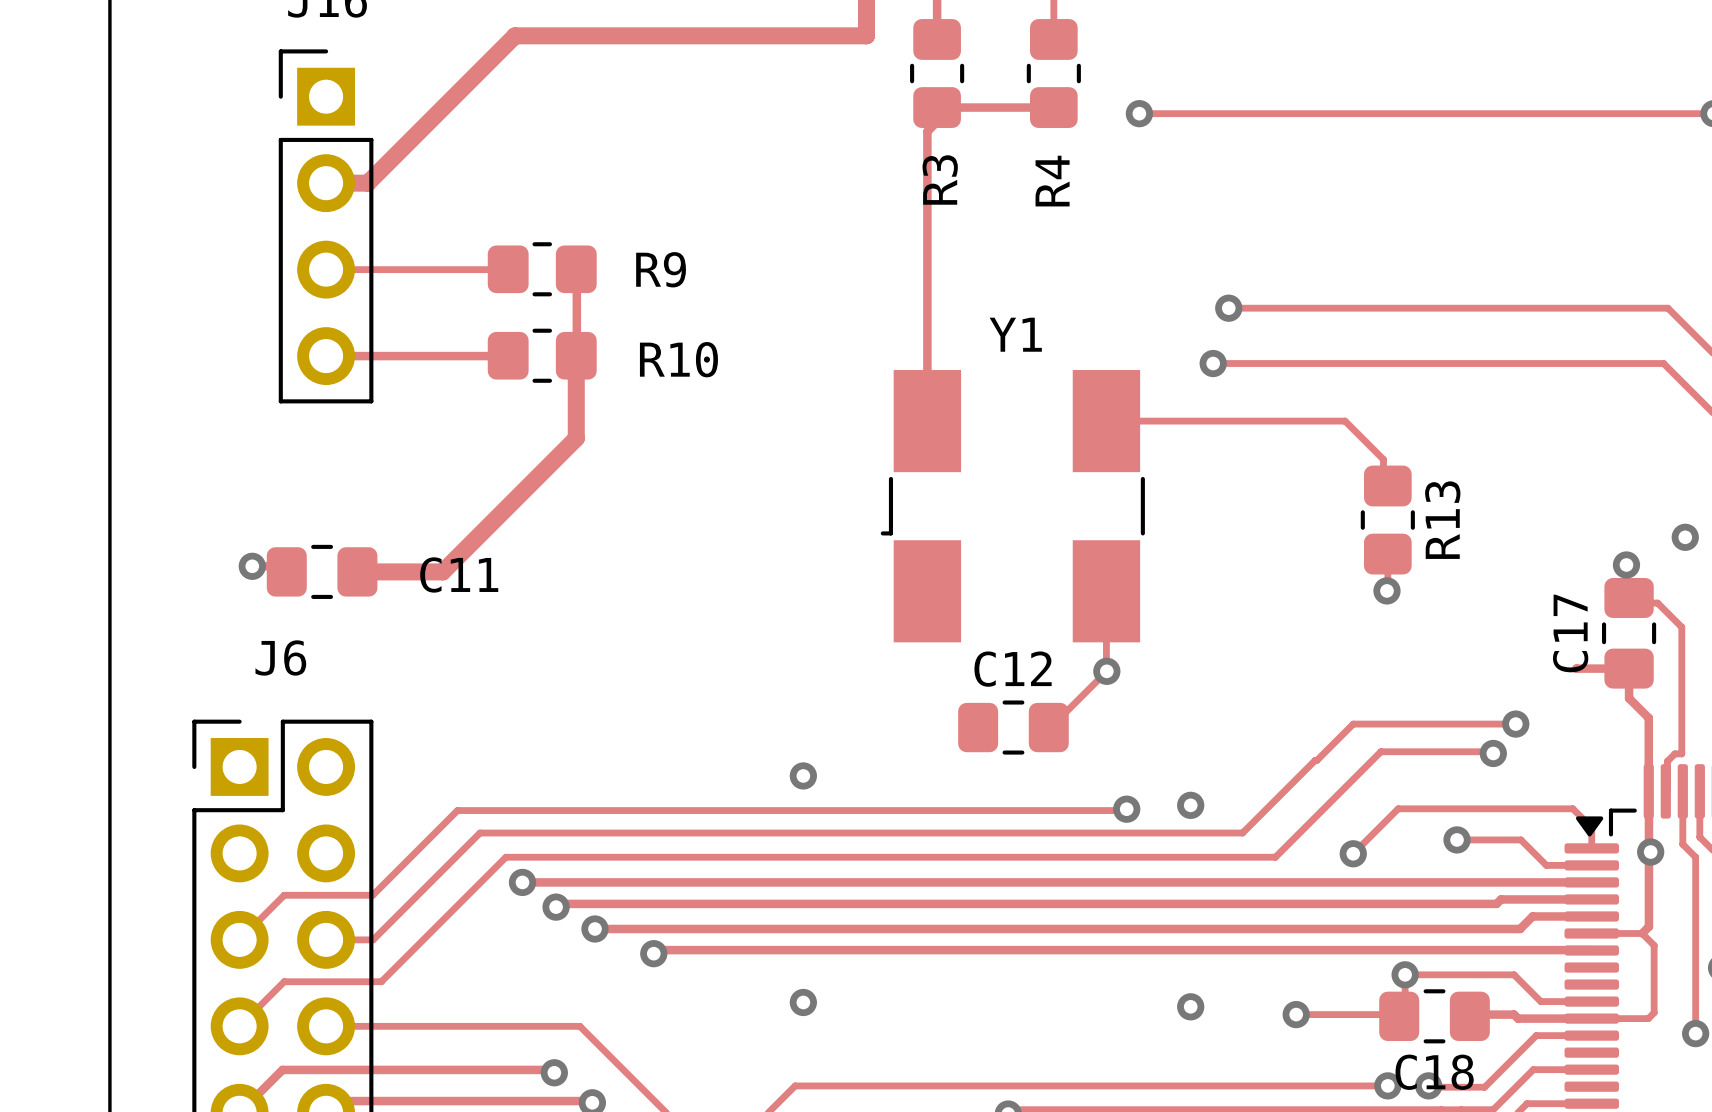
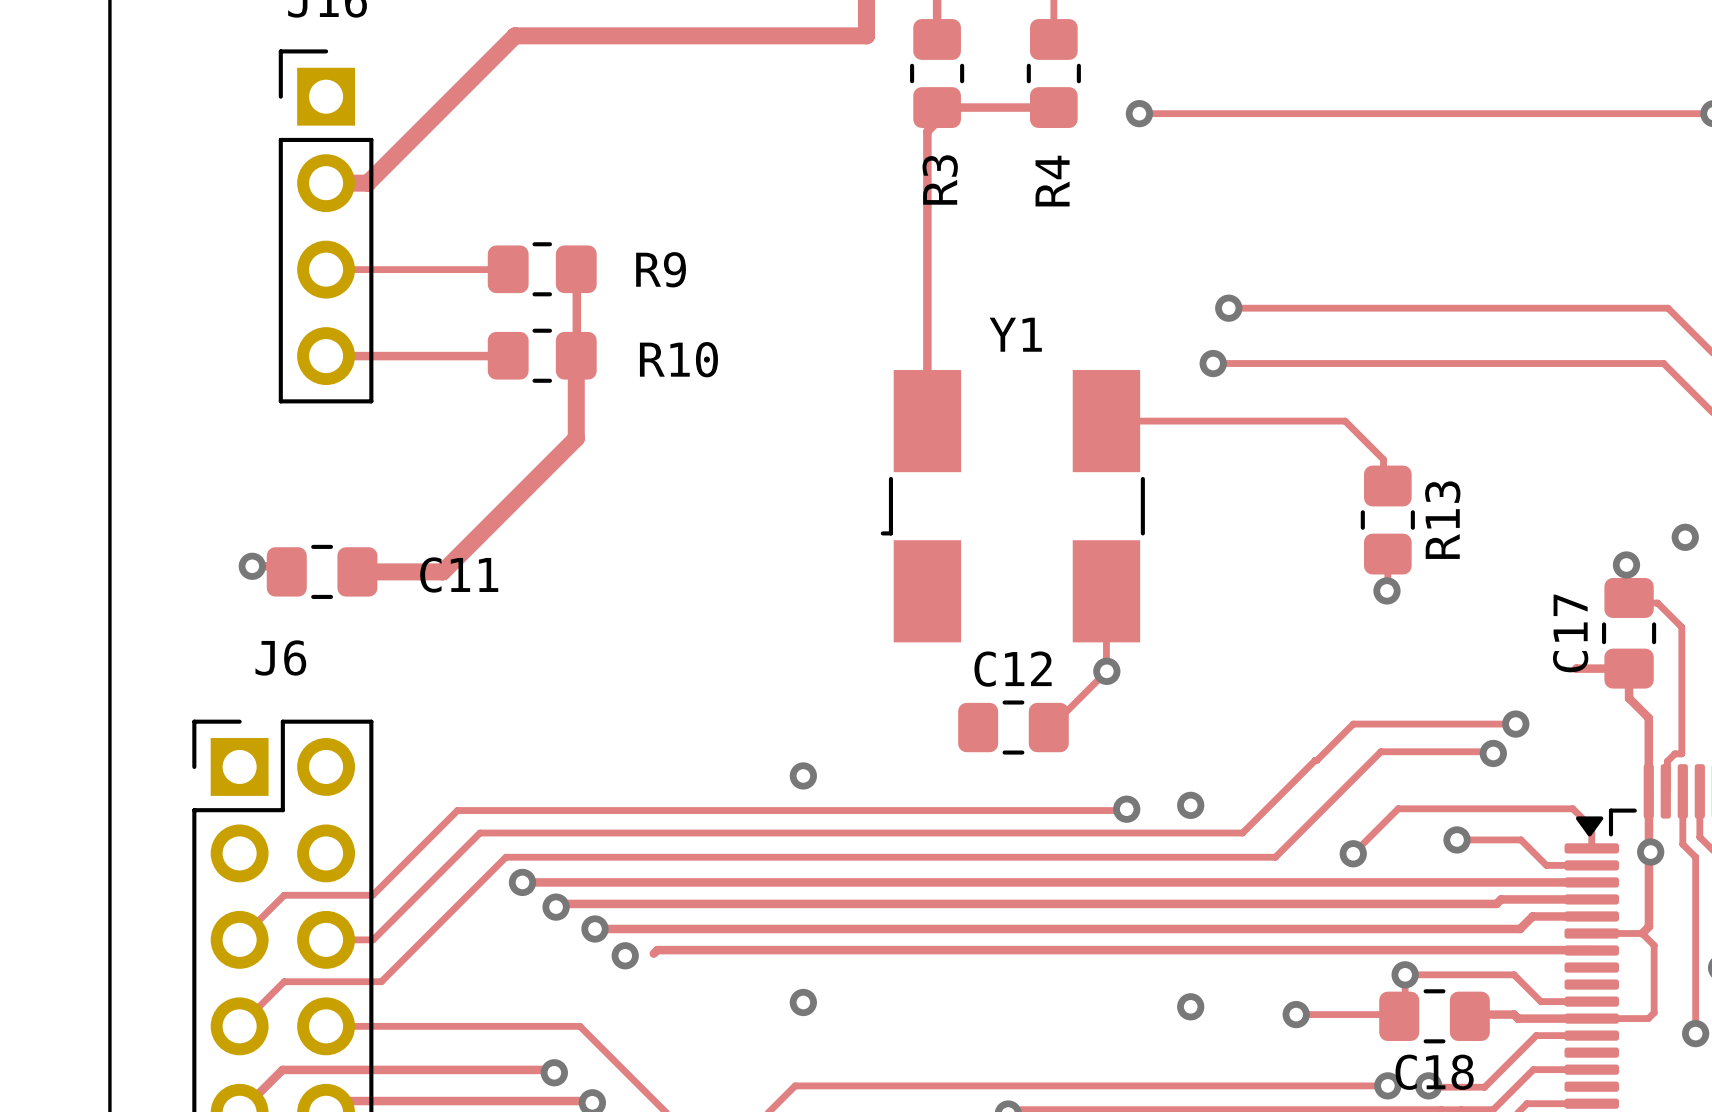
via position: (653, 953) -> (625, 955)

